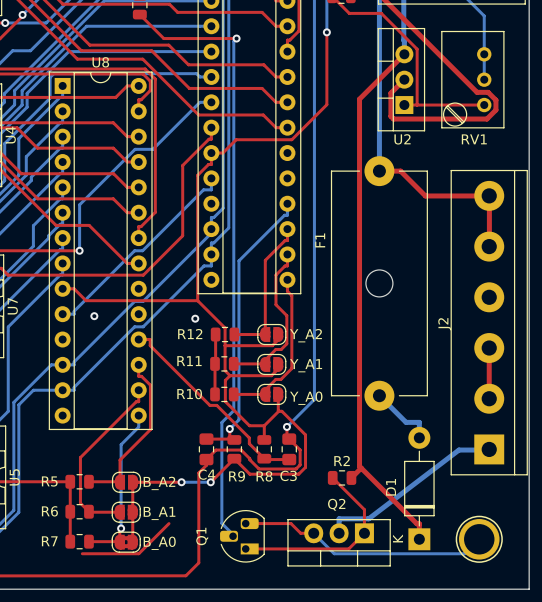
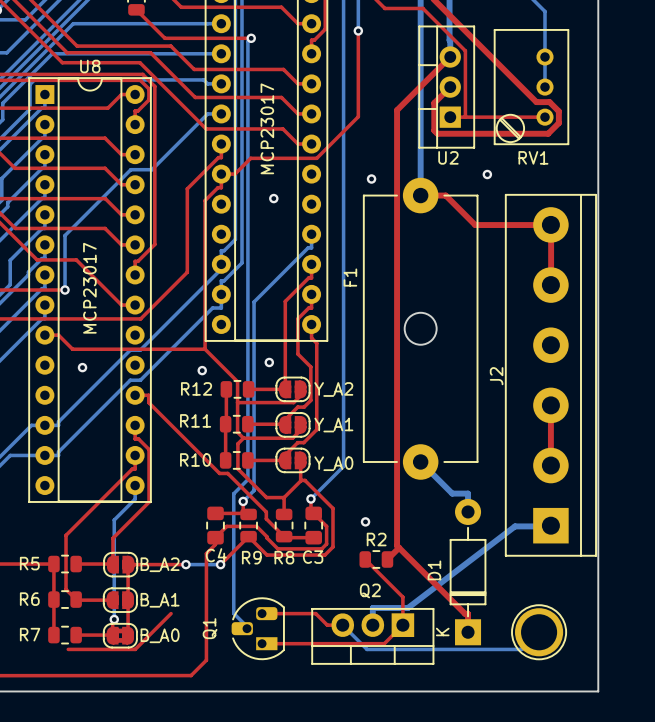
text: none -> MCP23017 (267, 128)
via: none -> (487, 174)
via: none -> (371, 179)
via: none -> (273, 198)
bottom track: (211, 178) (211, 189) (203, 189) (142, 250) (134, 250) (74, 311) (74, 314) (62, 314) -> none
text: none -> MCP23017 (89, 288)
via: none -> (269, 362)
via: none -> (365, 521)

